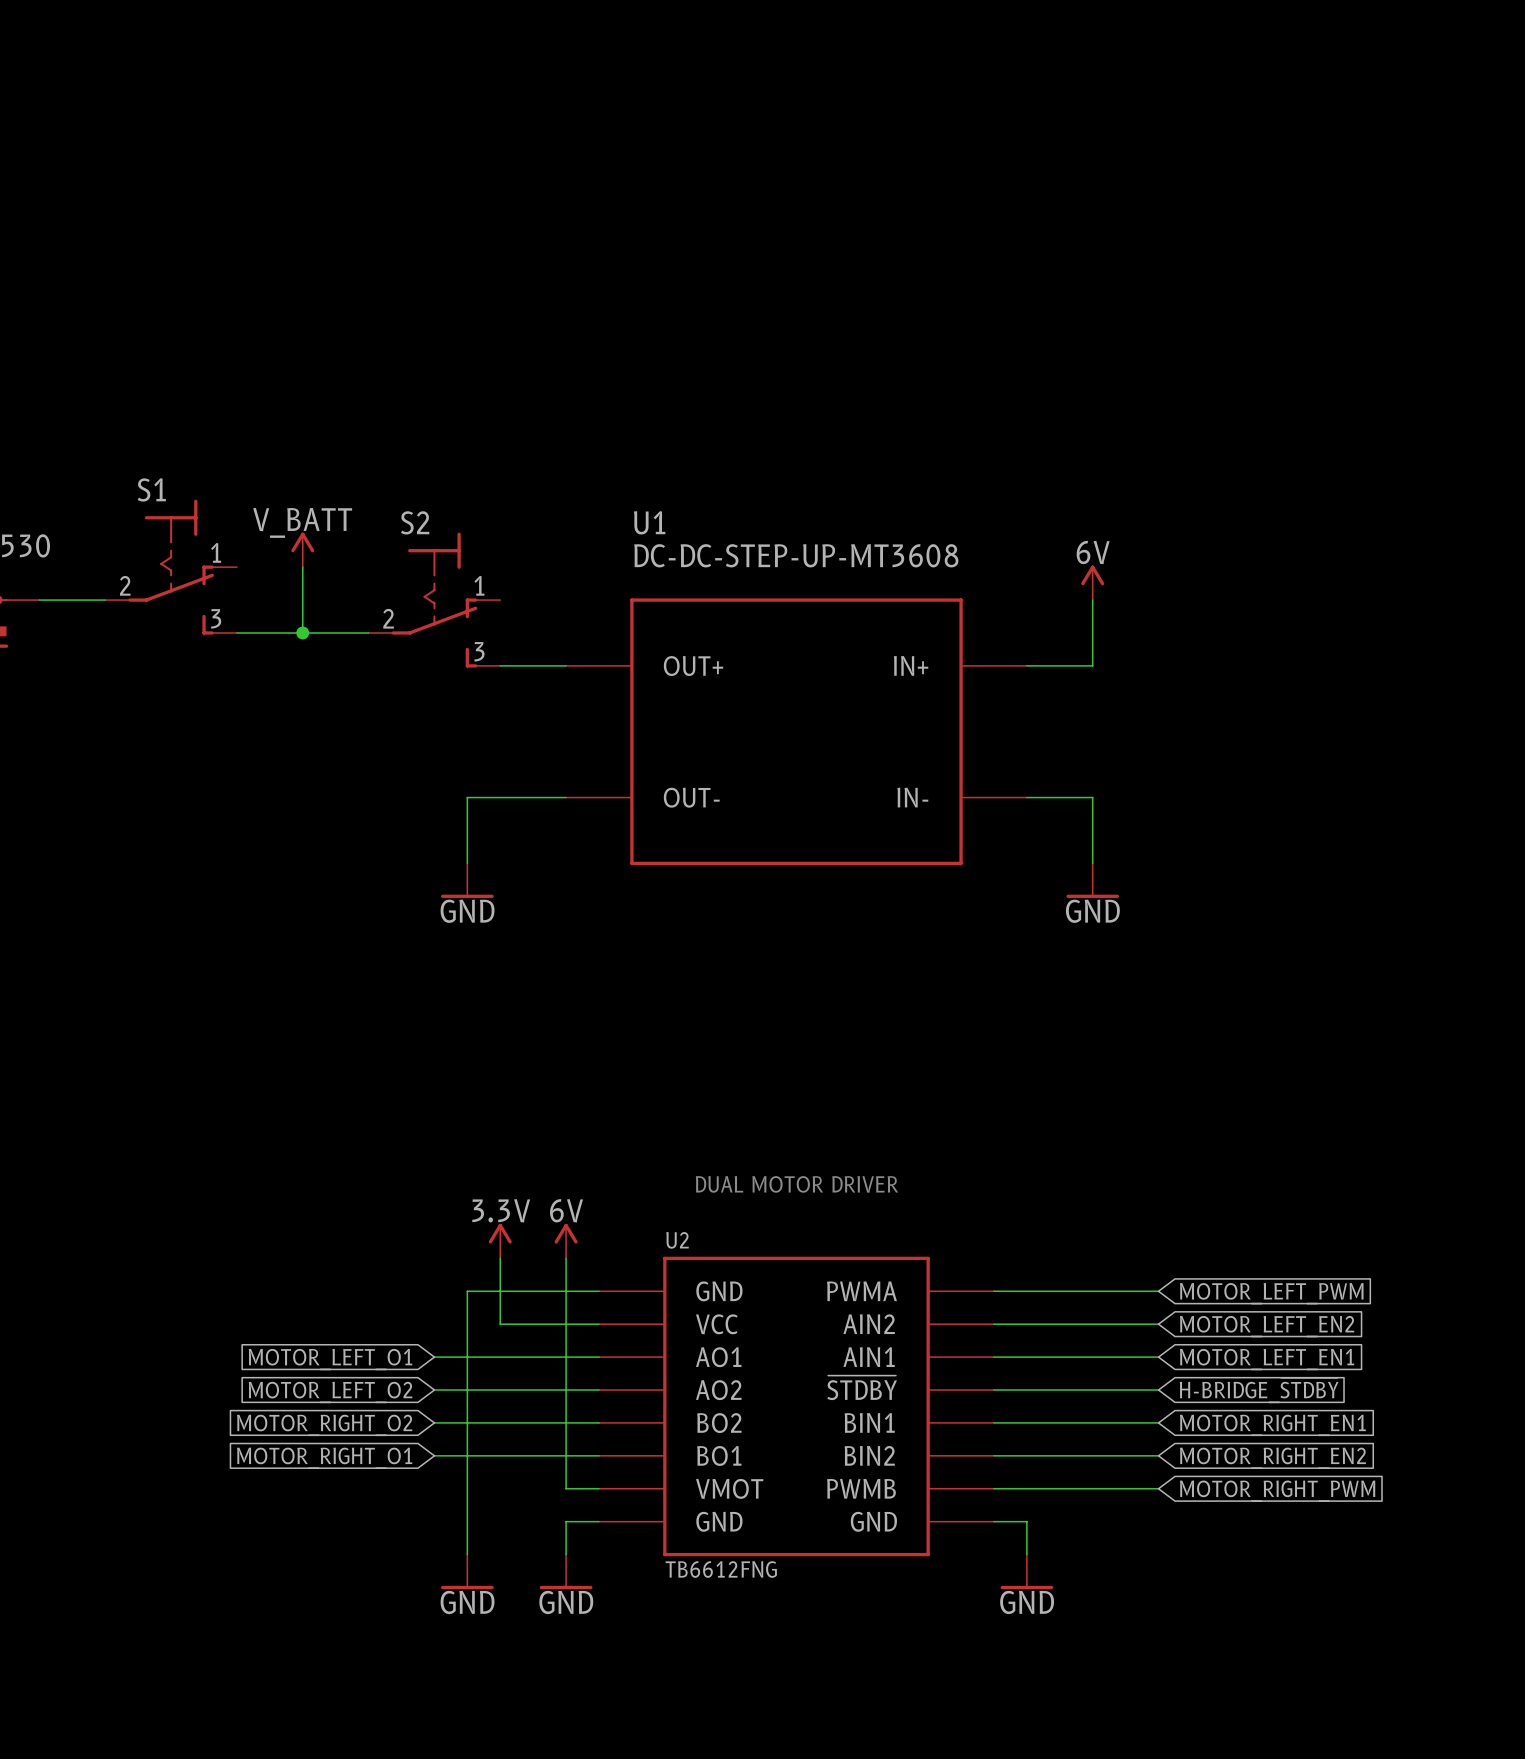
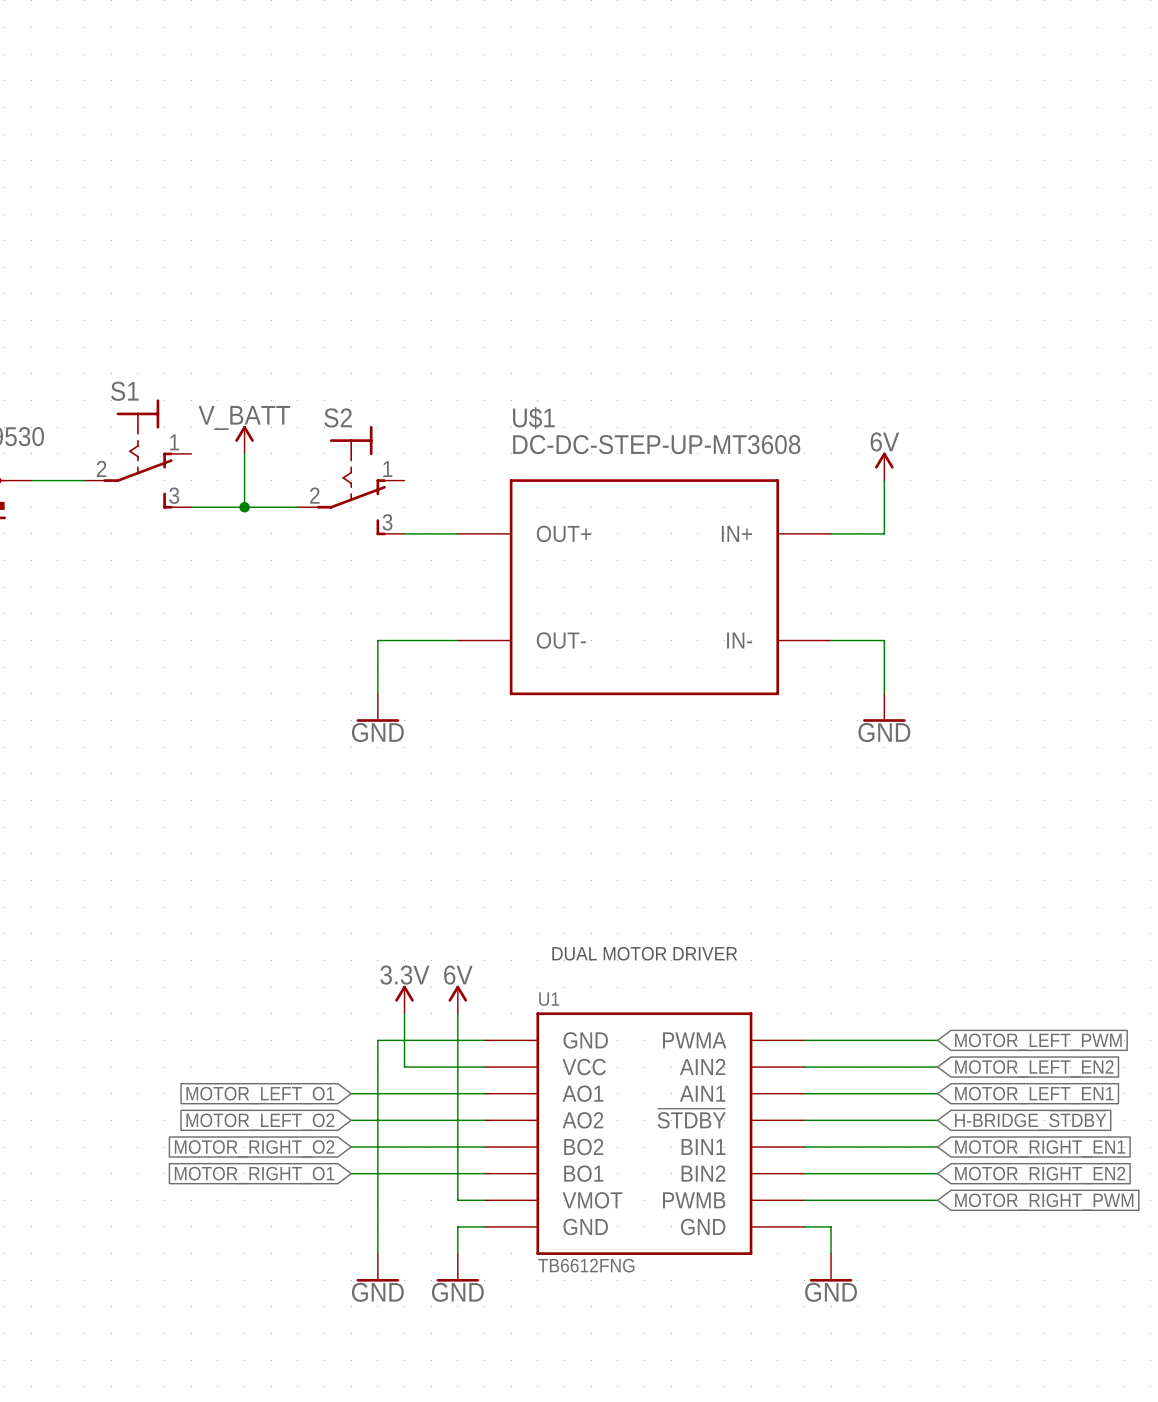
U1 name: U1 (649, 522) -> U$1 (533, 418)
U2 name: U2 (677, 1240) -> U1 (549, 999)

